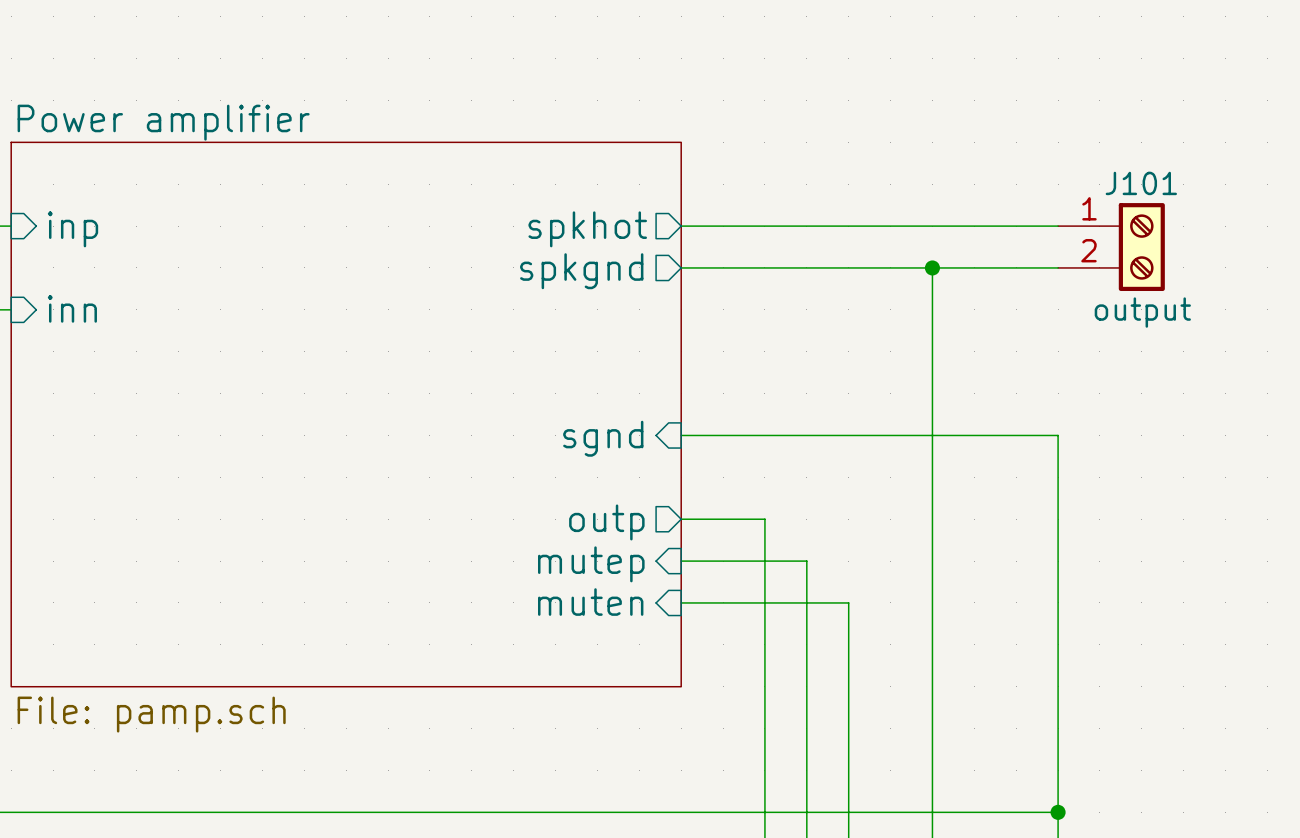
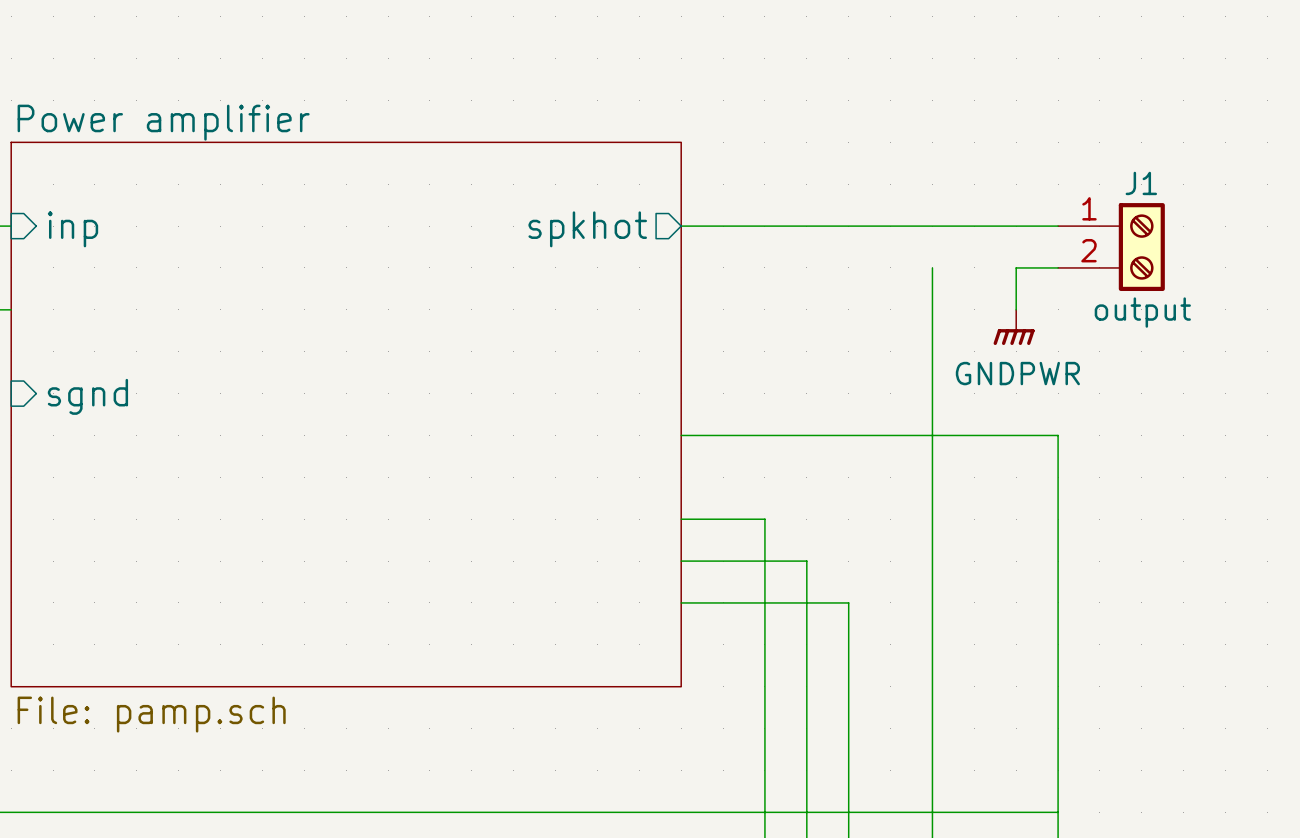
J101 name: J101 (1141, 183) -> J1 (1141, 183)
wire: (681, 267) (1016, 267) -> (1016, 309) (1016, 267)
junction: (932, 267) -> none
sheet pin: spkgnd (581, 271) -> none
sheet pin: inn (72, 308) -> none
power symbol: none -> GNDPWR (1014, 327)
sheet pin: none -> sgnd (87, 396)
sheet pin: sgnd (603, 438) -> none
sheet pin: outp (606, 522) -> none
sheet pin: mutep (591, 564) -> none
sheet pin: muten (590, 602) -> none
junction: (1058, 812) -> none

